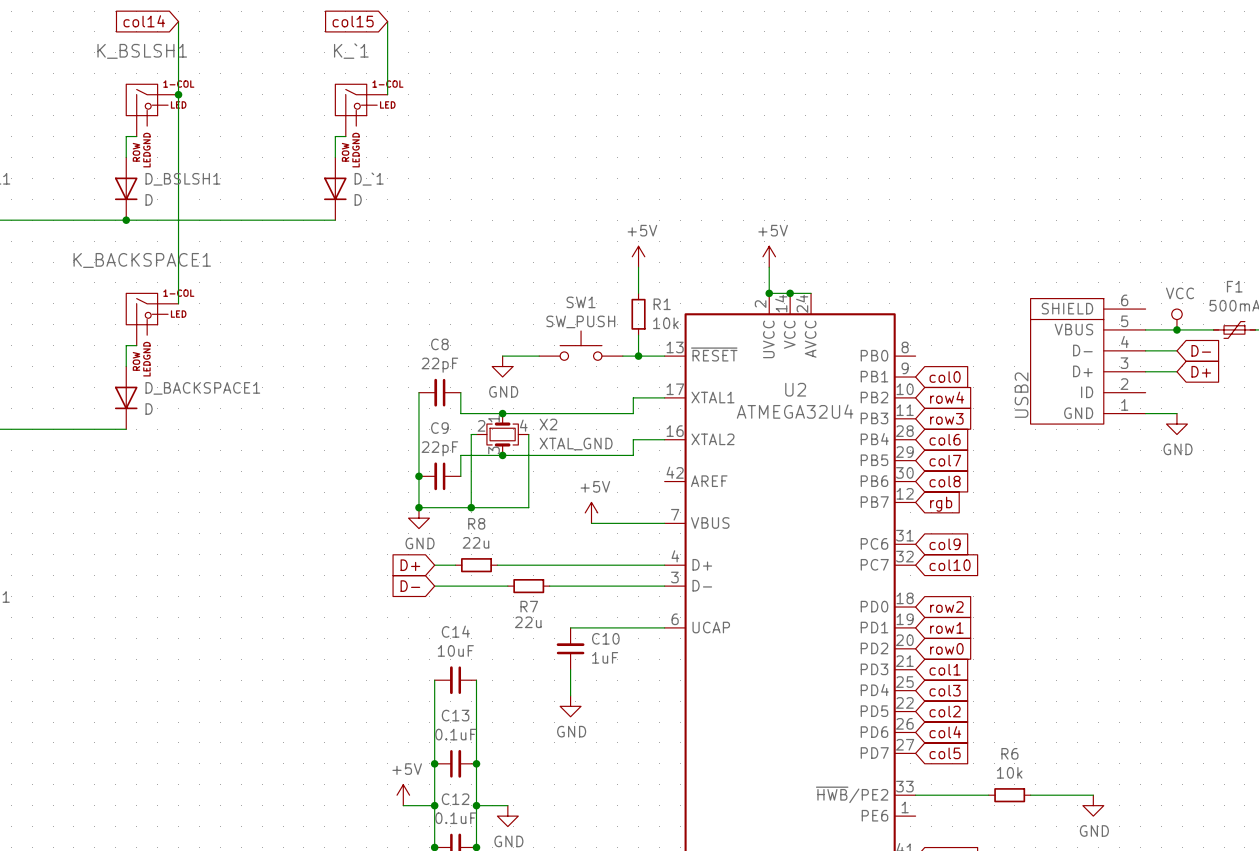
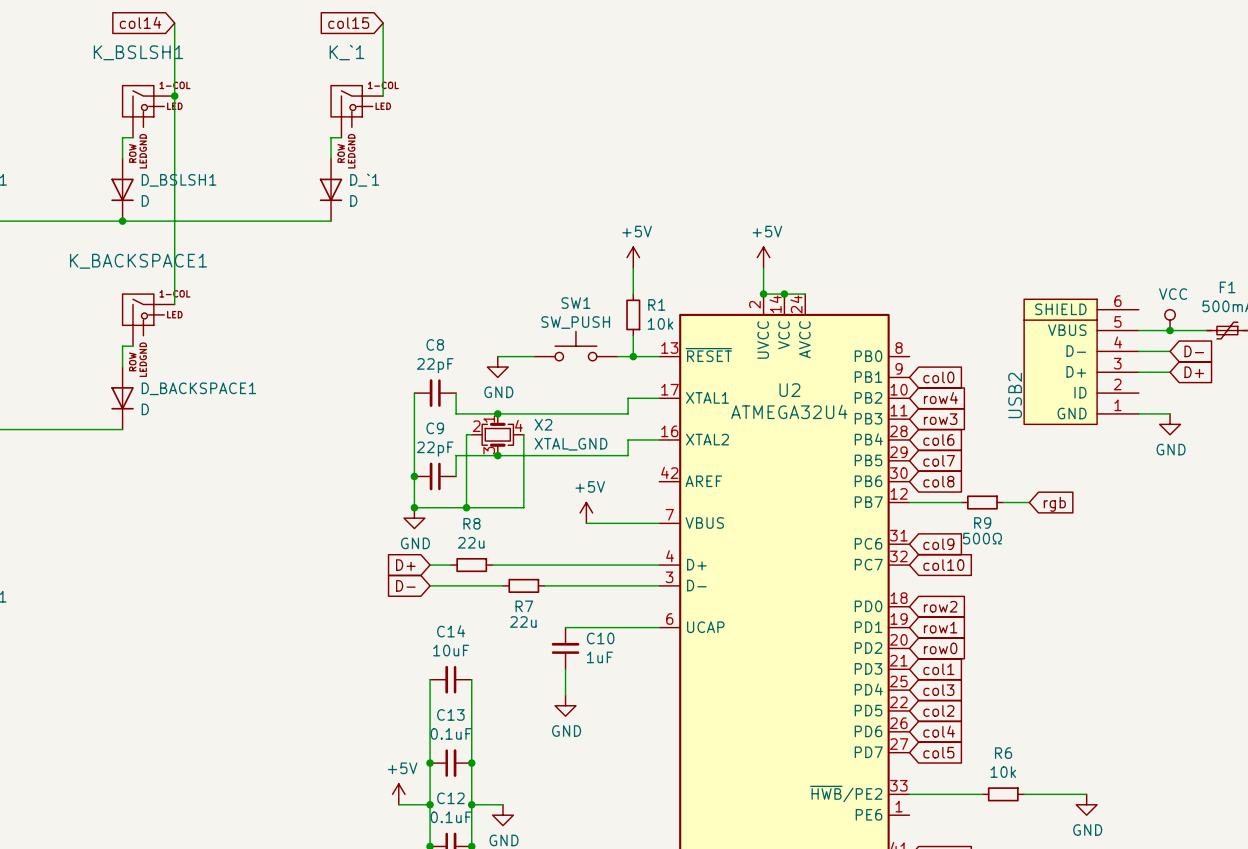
wire: none -> (909, 502) (961, 502)
R9: none -> 500Ω (982, 502)
wire: none -> (1003, 502) (1029, 502)
global label position: rgb (941, 504) -> rgb (1054, 504)

